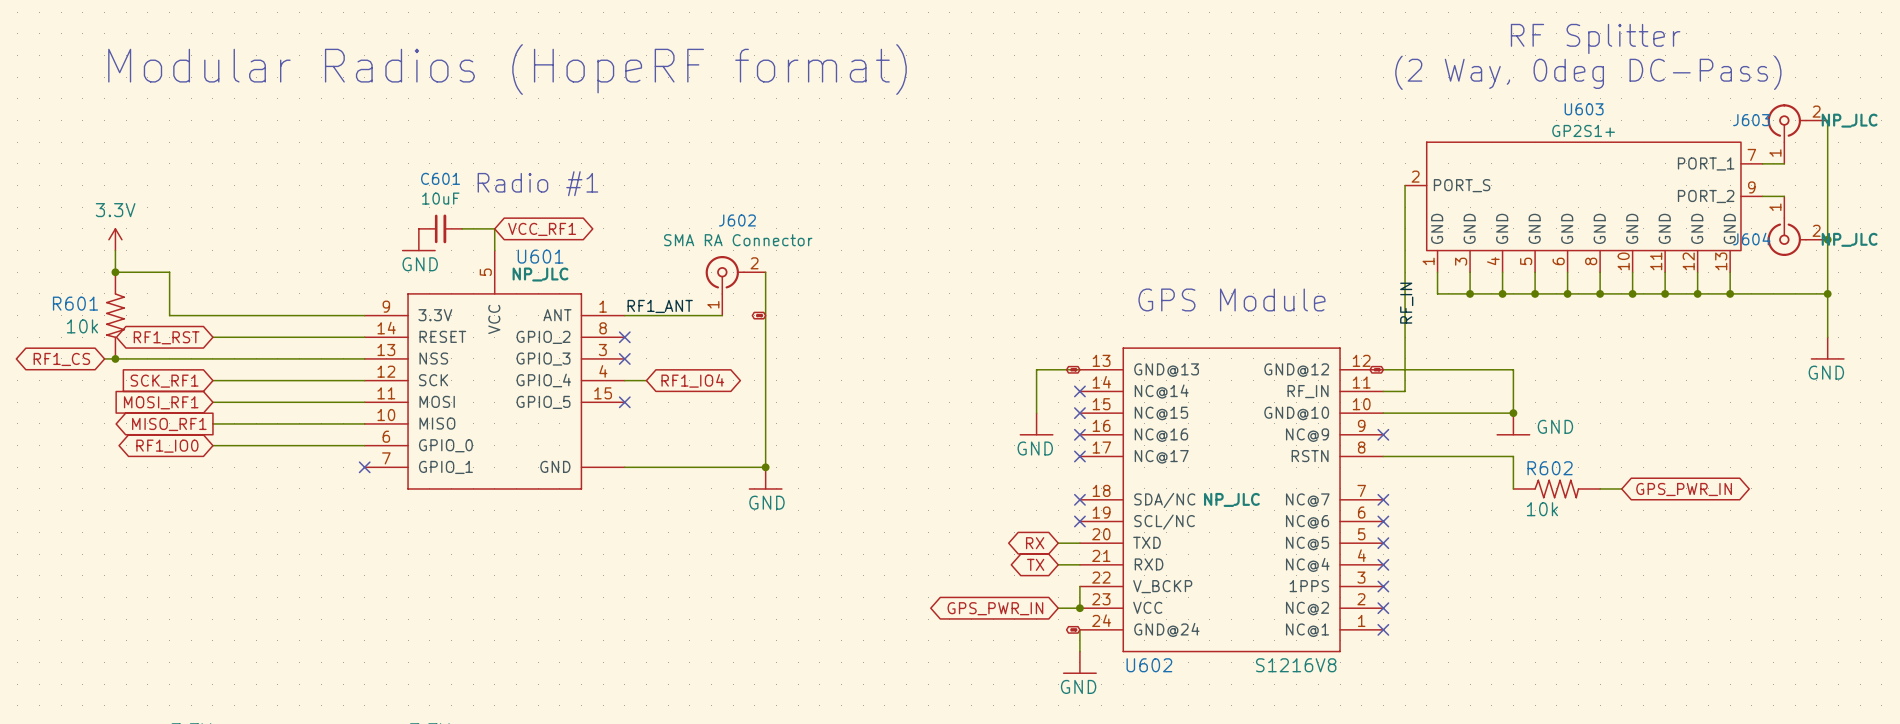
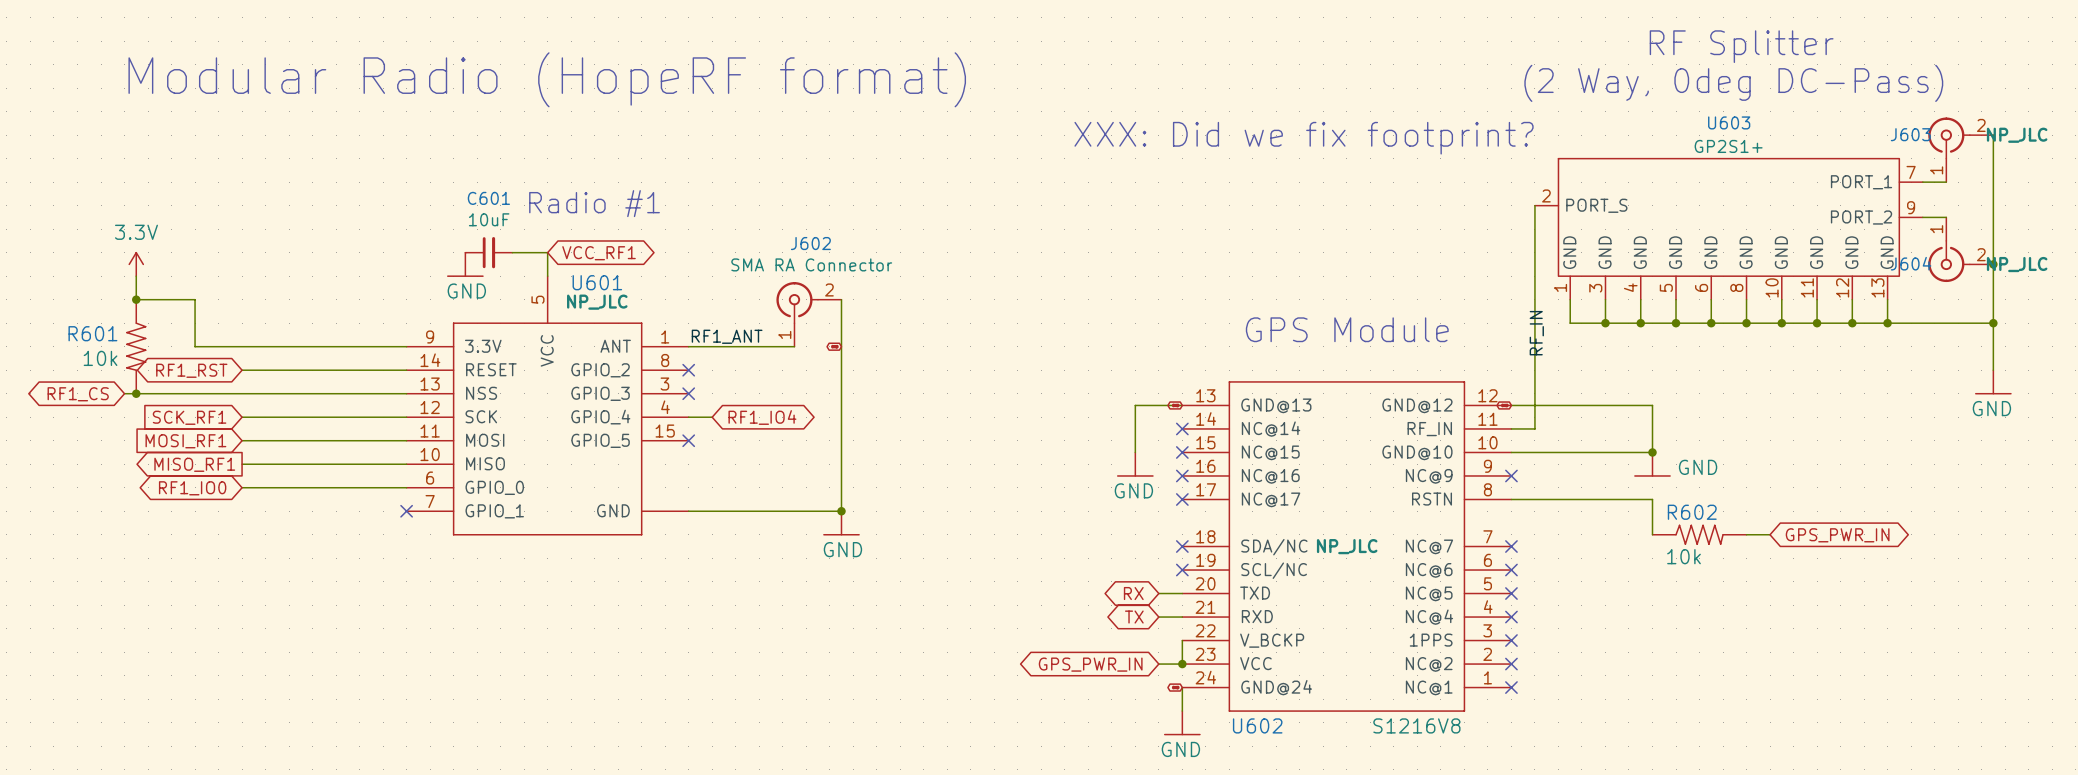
text: Modular Radios (HopeRF format) (507, 69) -> Modular Radio (HopeRF format) (547, 79)
text: none -> XXX: Did we fix footprint? (1304, 138)

